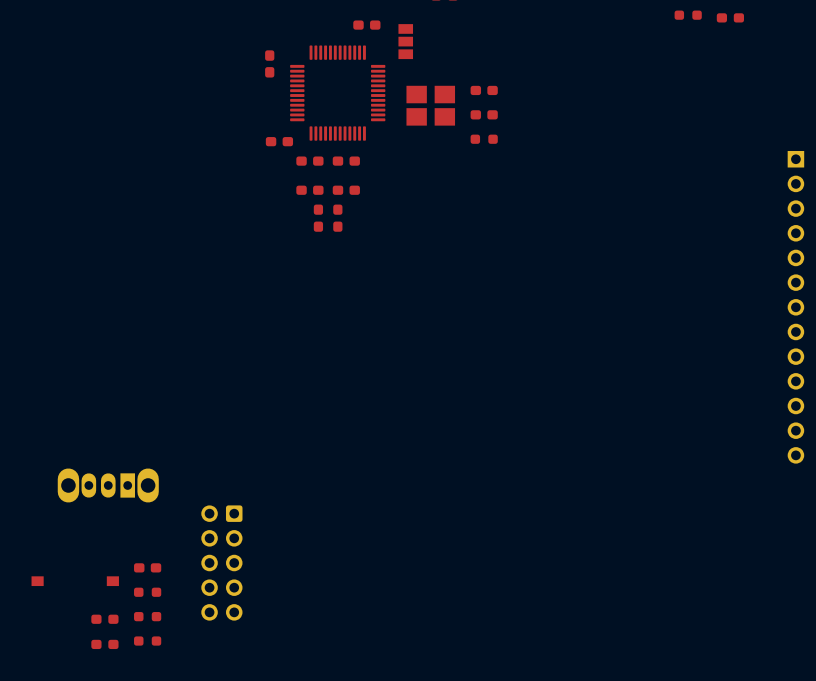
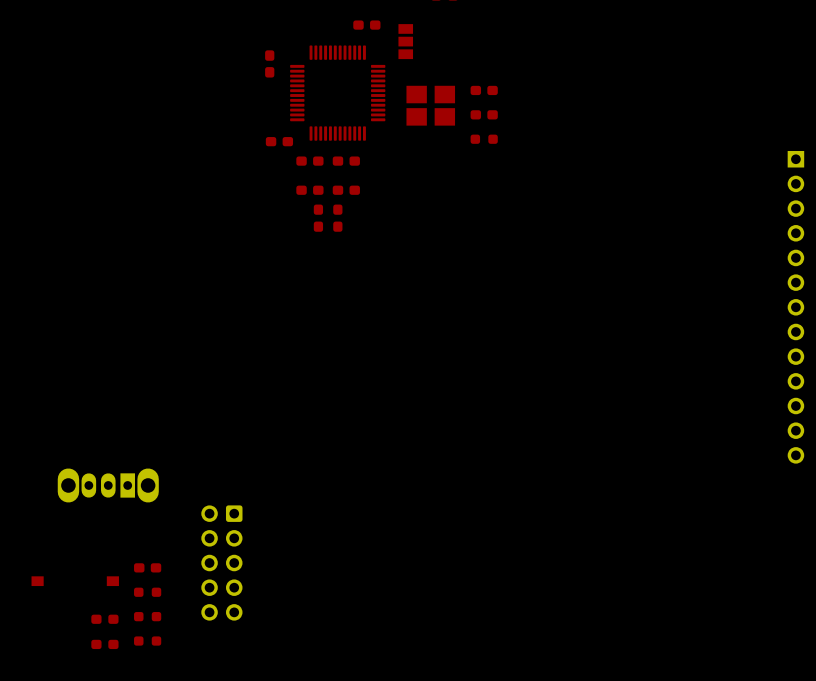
part: (688, 15) -> none
part: (730, 17) -> none

